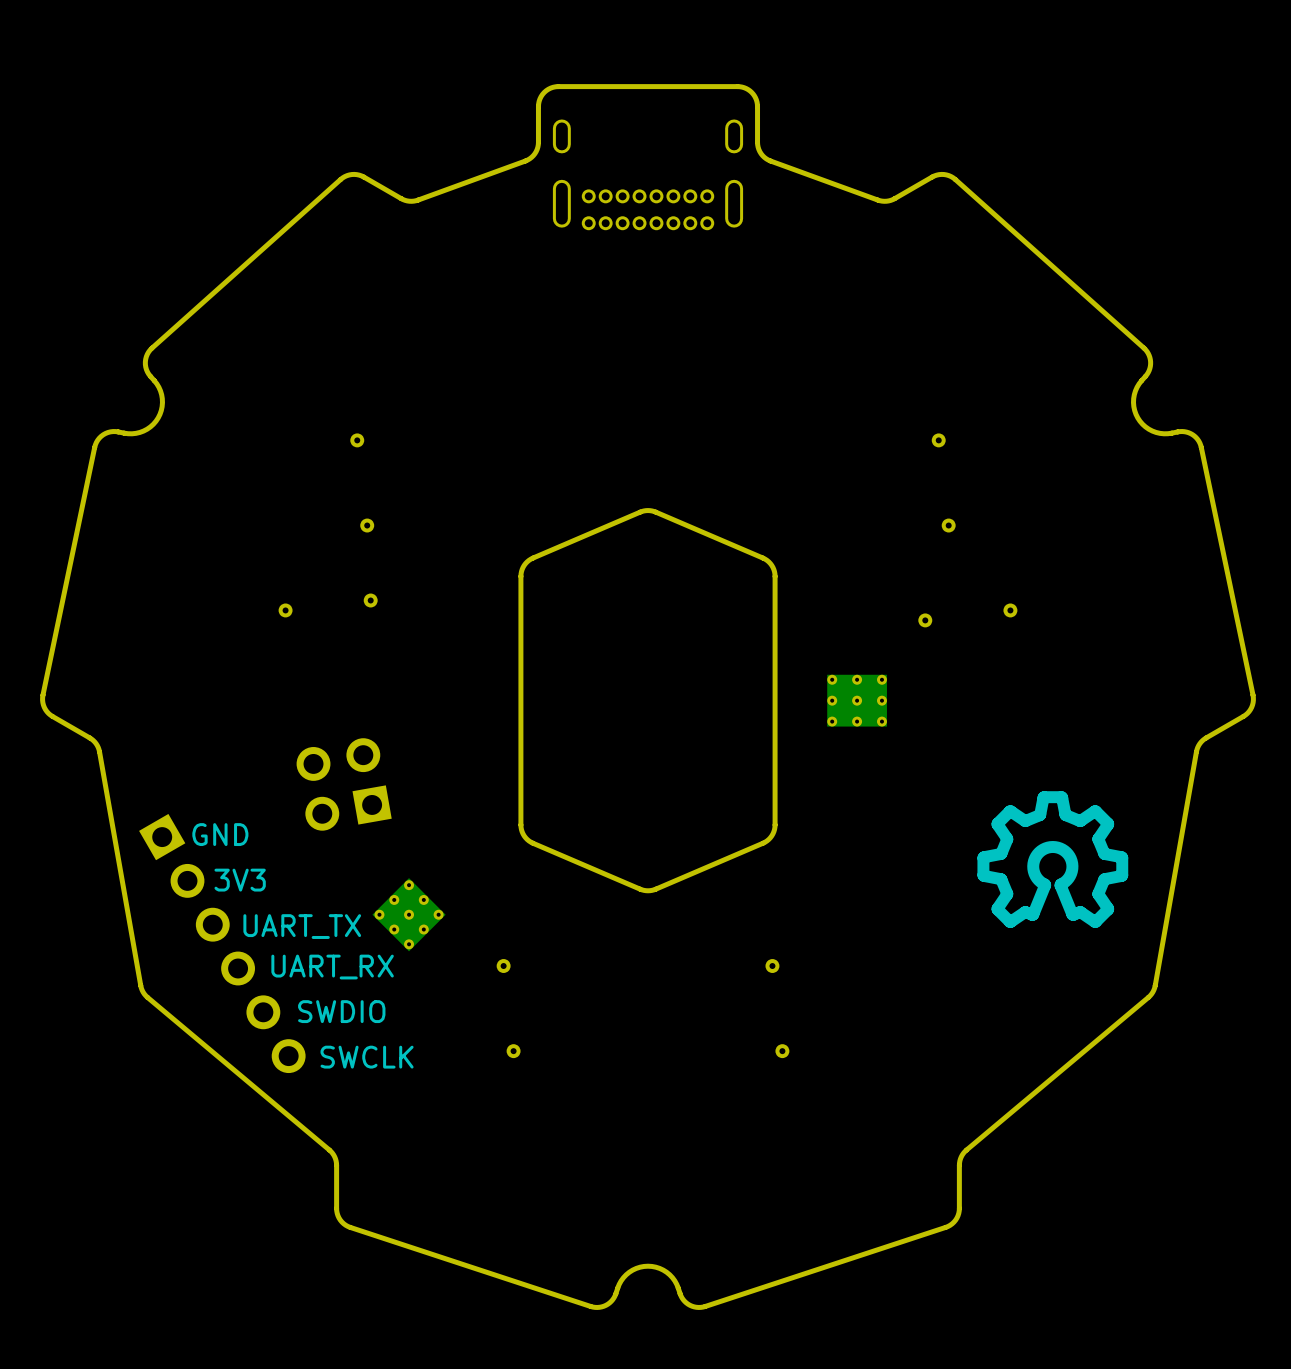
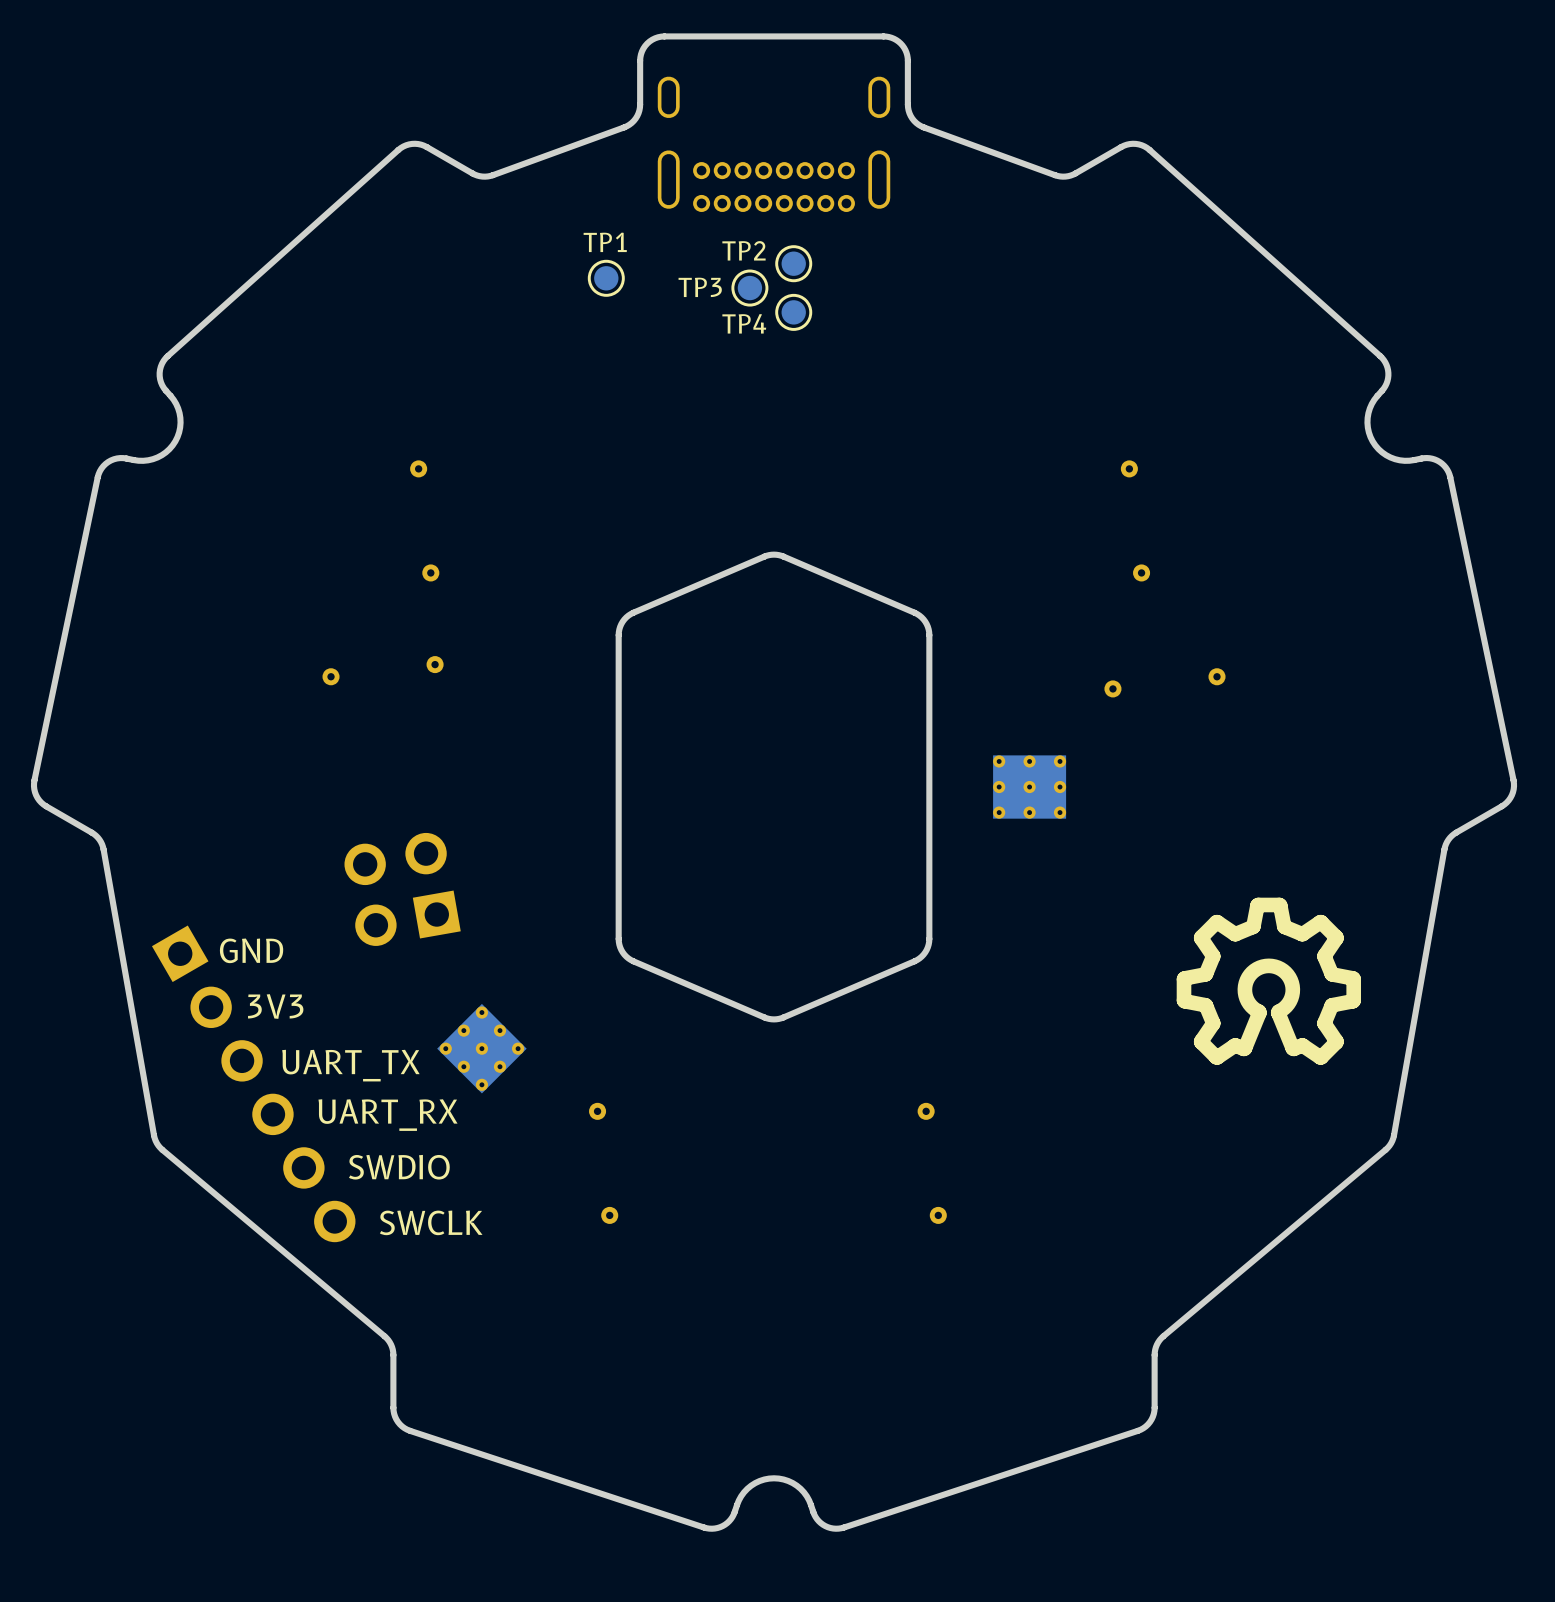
TP2: none -> (793, 263)
TP1: none -> (606, 278)
TP3: none -> (749, 288)
TP4: none -> (793, 312)

